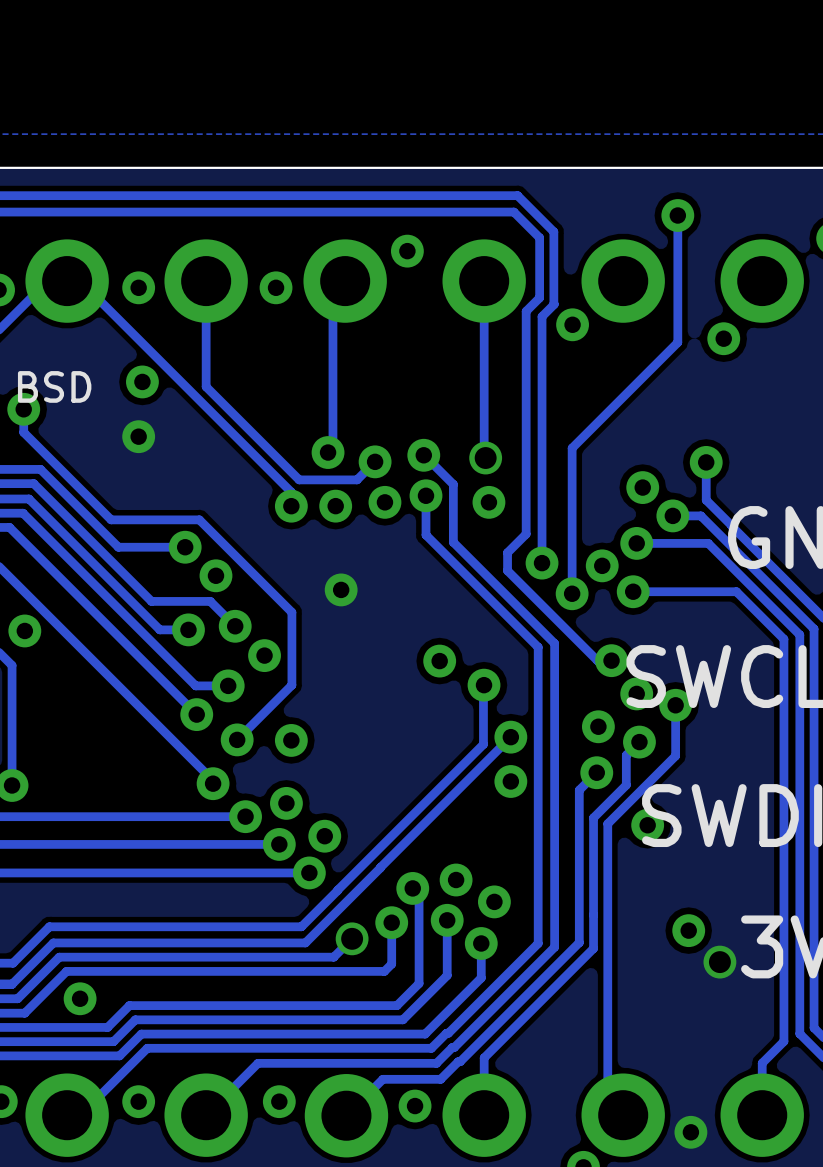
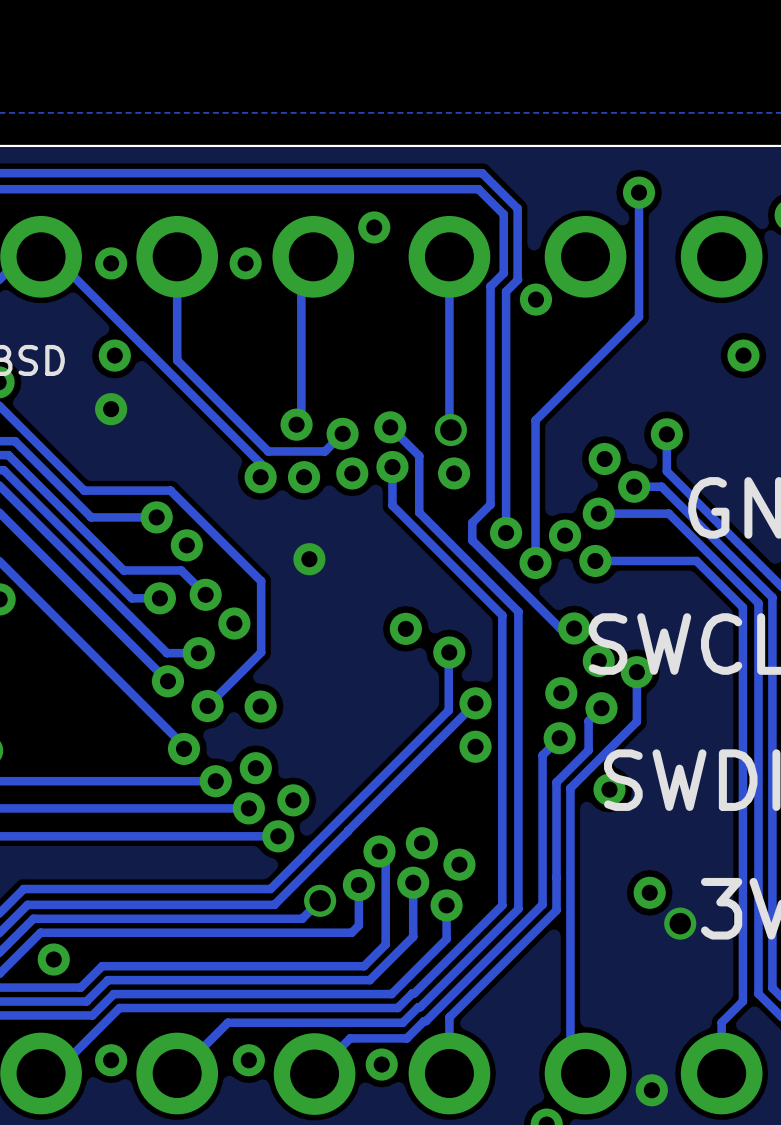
via position: (723, 338) -> (743, 355)

